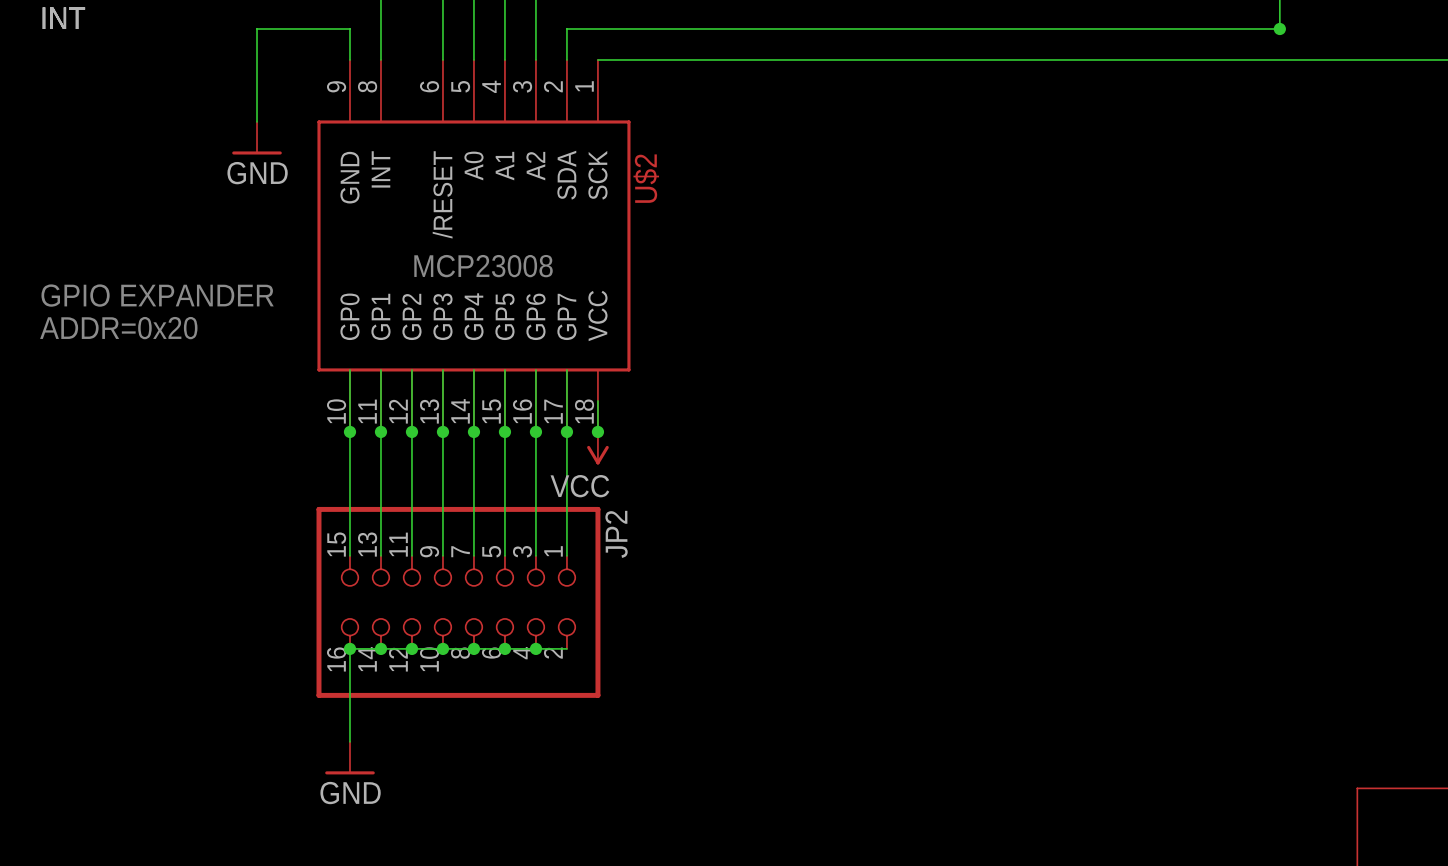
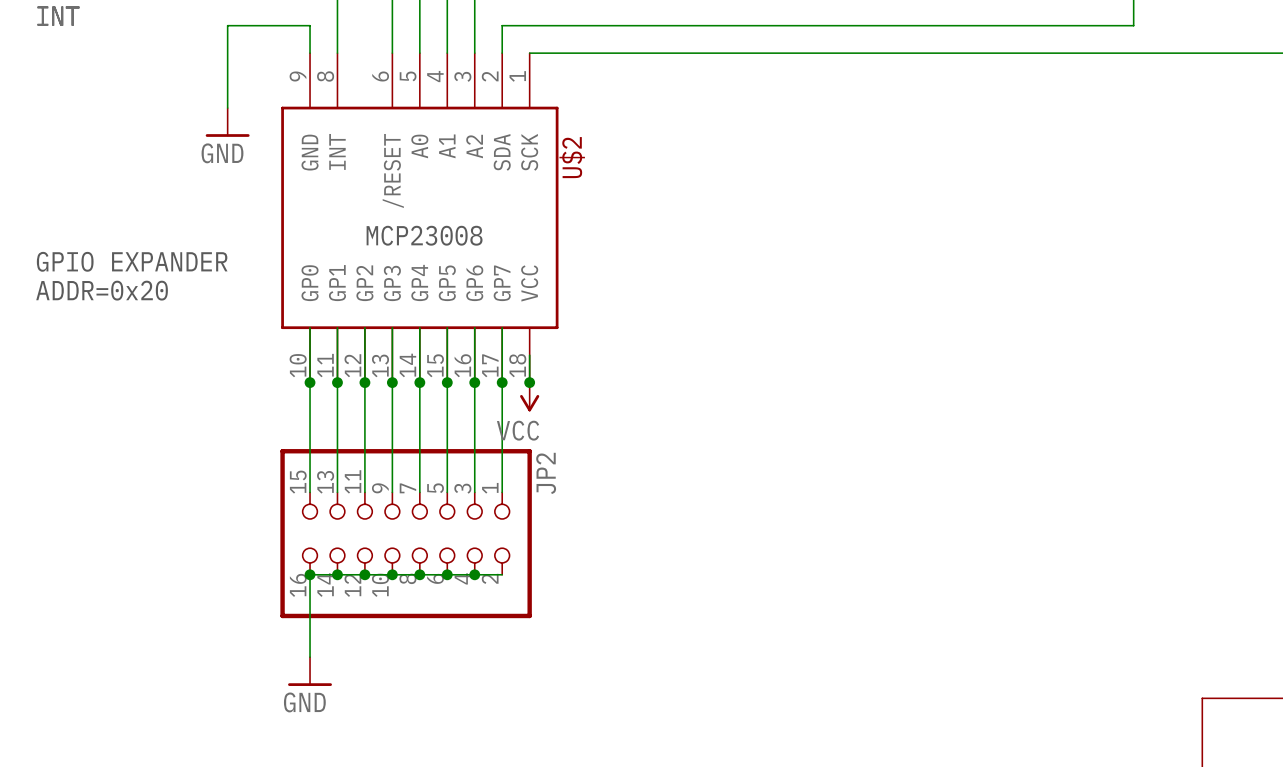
junction: (1279, 29) -> none

